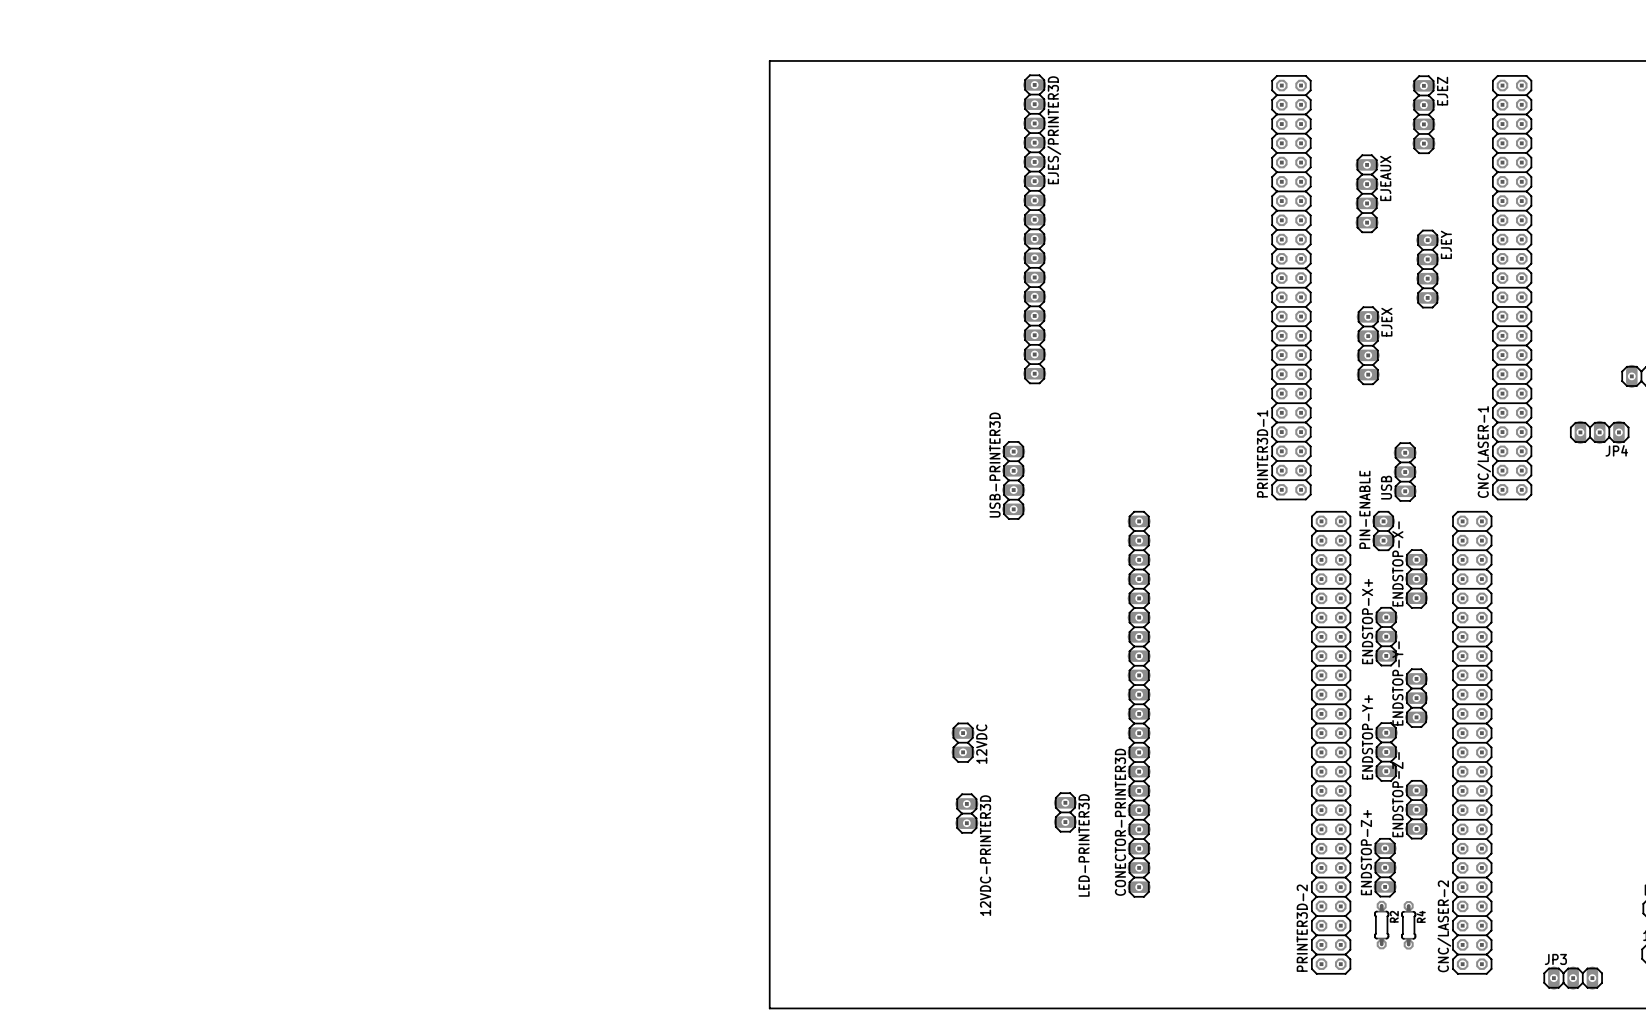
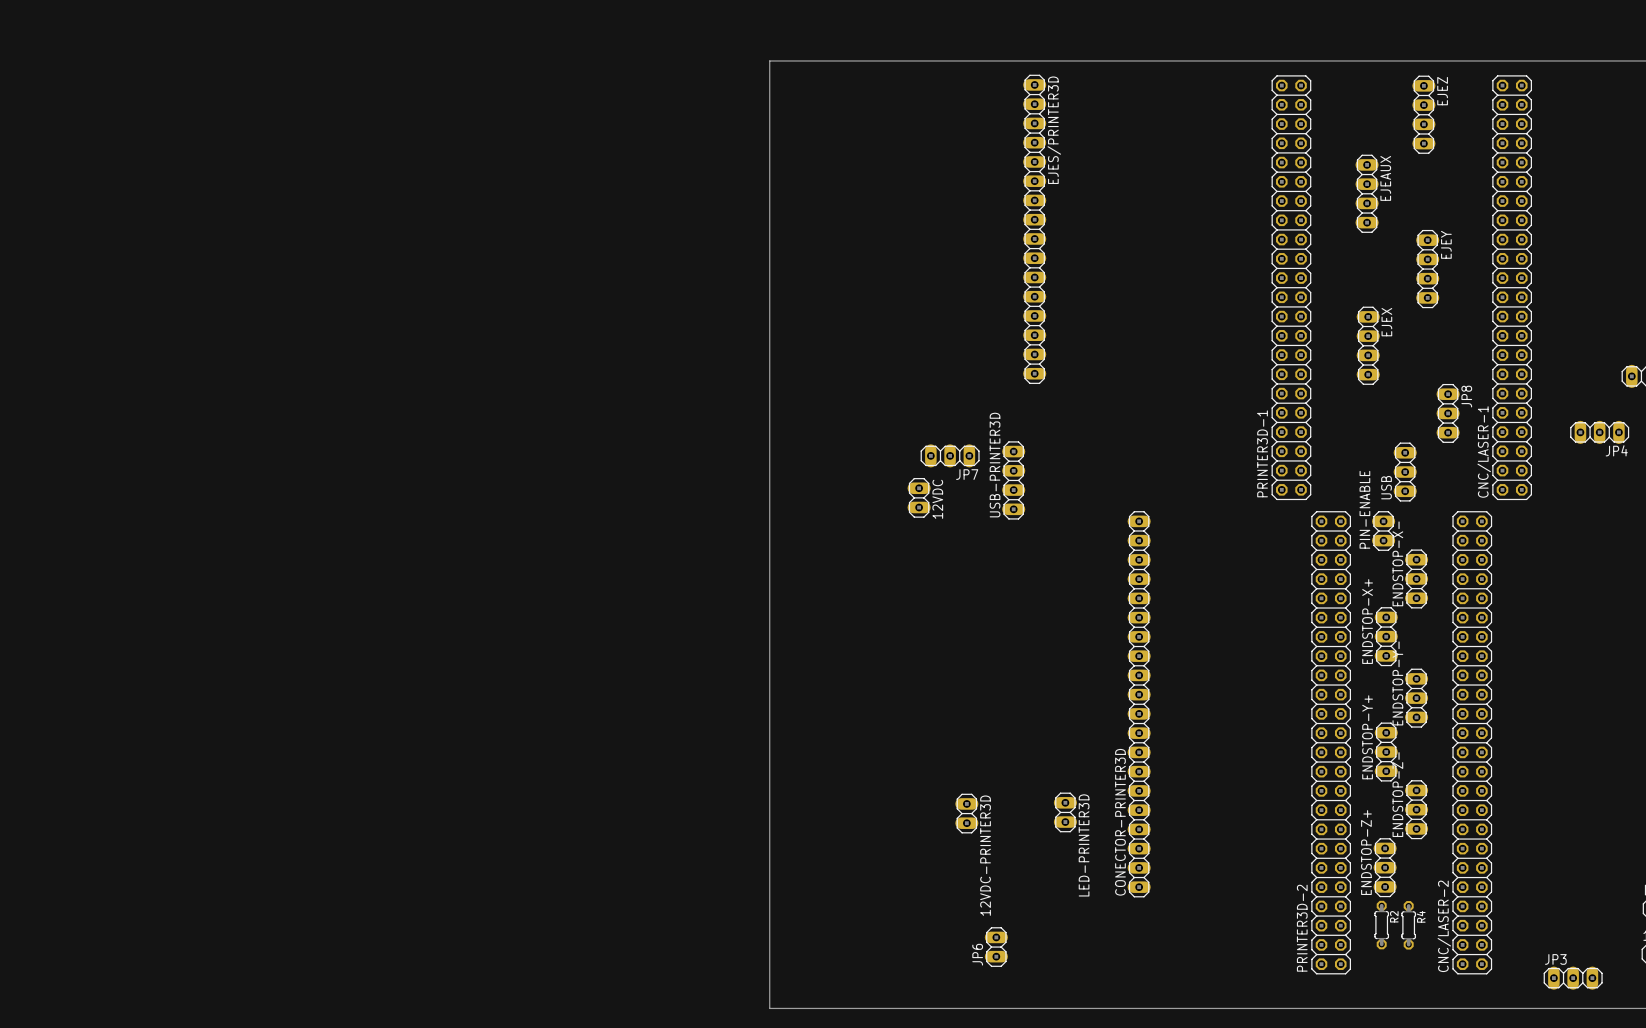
JP8: none -> (1448, 413)
JP7: none -> (950, 455)
12VDC position: (963, 742) -> (919, 497)
JP6: none -> (996, 947)

